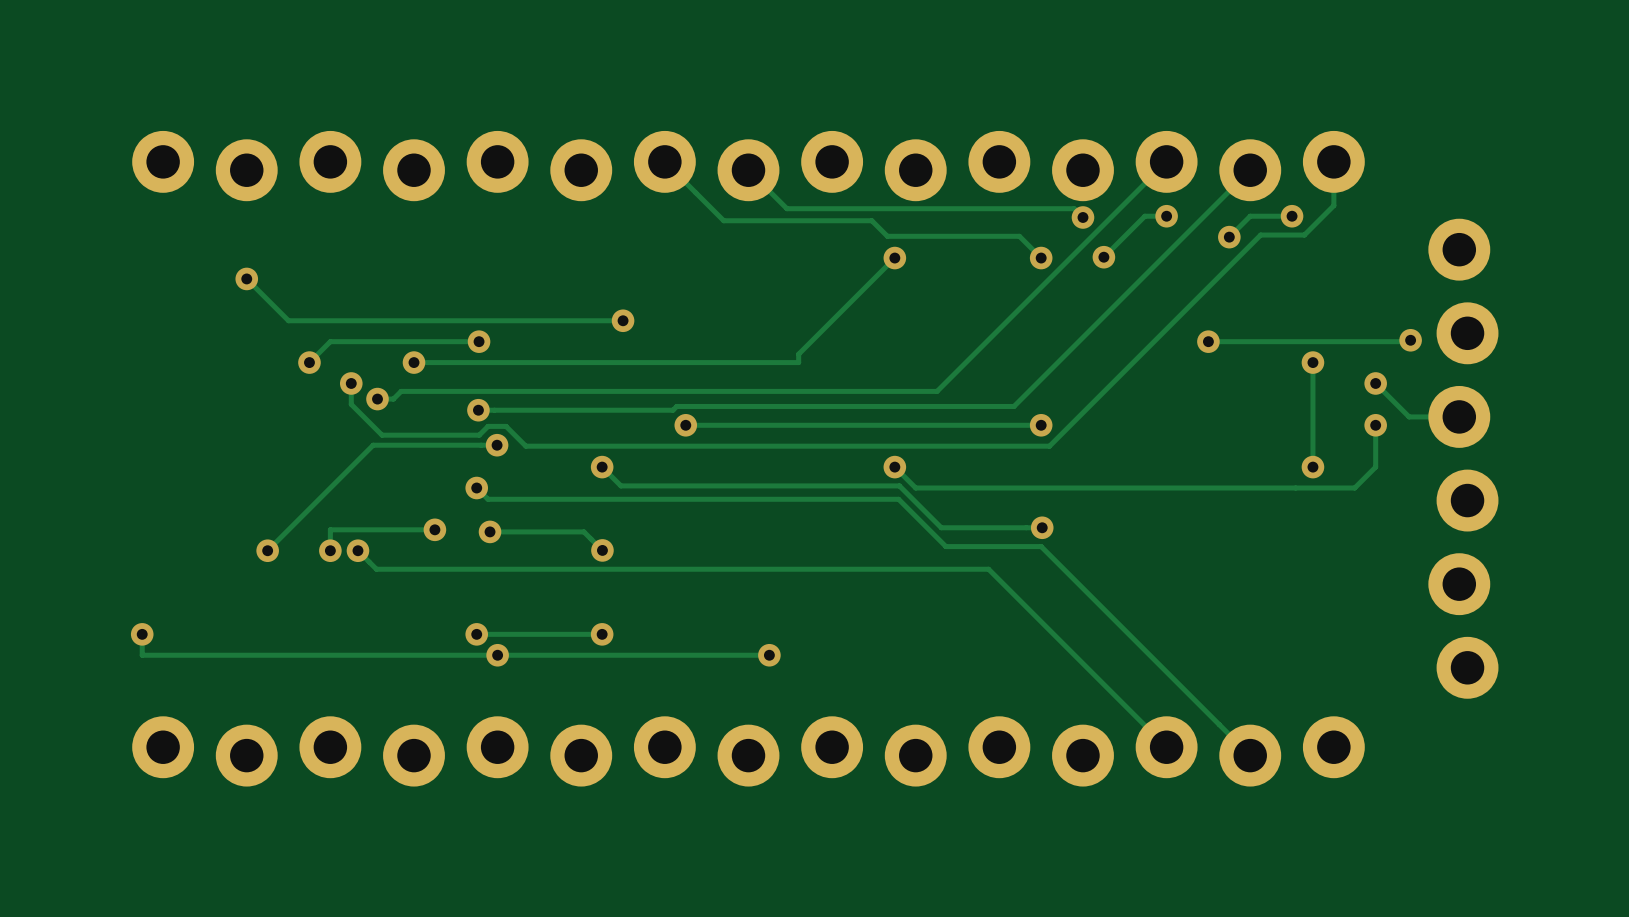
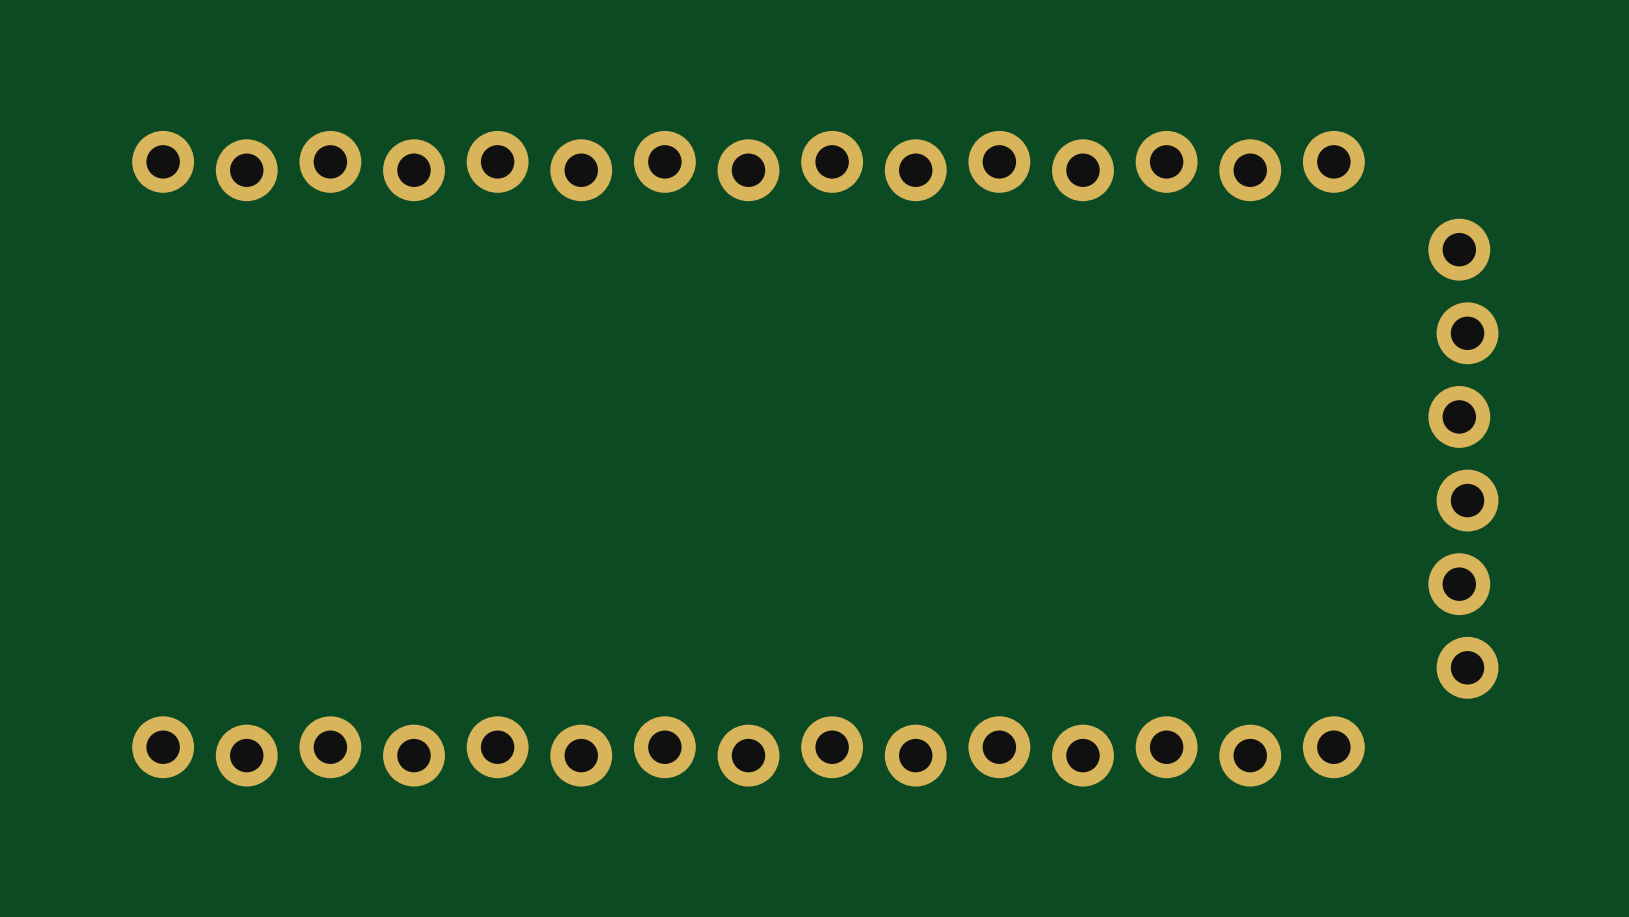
track: (664, 161) (723, 220) (871, 220) (887, 236) (1019, 236) (1041, 258) -> none
track: (1166, 161) (937, 391) (401, 391) (393, 399) (377, 399) -> none
track: (1333, 161) (1333, 205) (1304, 235) (1260, 235) (1049, 446) (525, 446) (506, 426) (488, 426) (479, 435) (382, 435) (351, 404) (351, 383) -> none
track: (748, 170) (786, 208) (1074, 208) (1082, 217) -> none
track: (1250, 170) (1014, 406) (676, 406) (673, 410) (478, 410) -> none
track: (1166, 216) (1144, 216) (1103, 257) -> none
via: (1166, 216) -> none
track: (1292, 216) (1250, 216) (1229, 237) -> none
via: (1292, 216) -> none
via: (1082, 217) -> none
via: (1229, 237) -> none
via: (1103, 257) -> none
track: (894, 258) (798, 354) (798, 362) (414, 362) -> none
via: (894, 258) -> none
via: (1041, 258) -> none
track: (246, 278) (288, 320) (623, 320) -> none
via: (246, 278) -> none
via: (623, 320) -> none
track: (1410, 340) (1208, 341) -> none
via: (1410, 340) -> none
track: (479, 341) (330, 341) (309, 362) -> none
via: (479, 341) -> none
via: (1208, 341) -> none
via: (309, 362) -> none
via: (414, 362) -> none
track: (1312, 362) (1312, 467) -> none
via: (1312, 362) -> none
via: (351, 383) -> none
track: (1375, 383) (1409, 416) (1459, 416) -> none
via: (1375, 383) -> none
via: (377, 399) -> none
via: (478, 410) -> none
via: (685, 425) -> none
track: (1041, 425) (685, 425) -> none
via: (1041, 425) -> none
track: (1375, 425) (1375, 467) (1354, 488) (915, 488) (894, 467) -> none
via: (1375, 425) -> none
track: (497, 445) (373, 445) (267, 550) -> none
via: (497, 445) -> none
track: (602, 467) (620, 485) (899, 485) (941, 527) (1042, 527) -> none
via: (602, 467) -> none
via: (894, 467) -> none
via: (1312, 467) -> none
track: (476, 488) (488, 499) (898, 499) (945, 546) (1041, 546) (1250, 755) -> none
via: (476, 488) -> none
via: (1042, 527) -> none
track: (434, 529) (330, 529) (330, 550) -> none
via: (434, 529) -> none
track: (490, 531) (583, 531) (602, 550) -> none
via: (490, 531) -> none
via: (267, 550) -> none
via: (330, 550) -> none
track: (357, 550) (376, 569) (988, 569) (1166, 747) -> none
via: (357, 550) -> none
via: (602, 550) -> none
track: (142, 634) (142, 655) (769, 655) -> none
via: (142, 634) -> none
via: (476, 634) -> none
track: (602, 634) (476, 634) -> none
via: (602, 634) -> none
via: (497, 655) -> none
via: (769, 655) -> none

